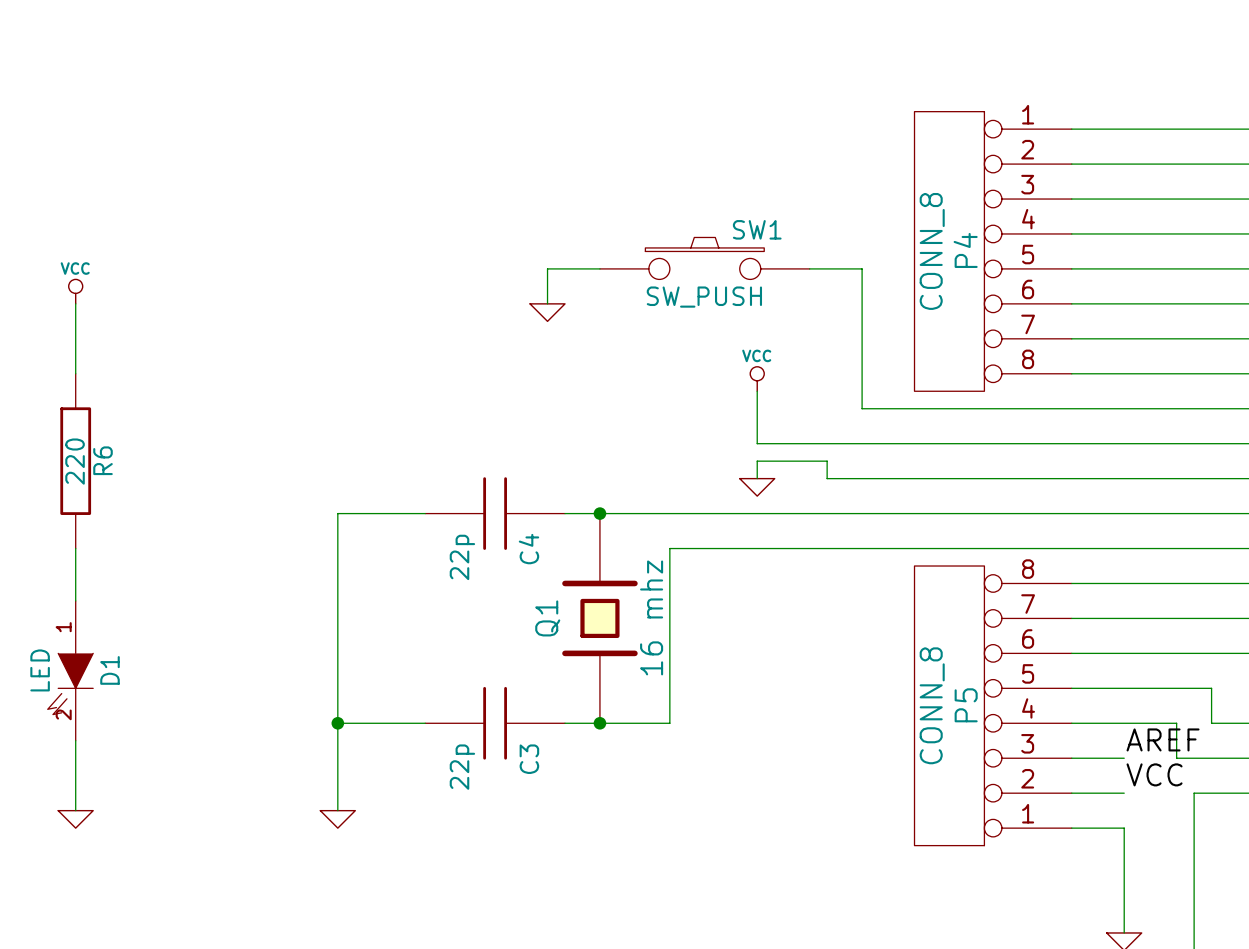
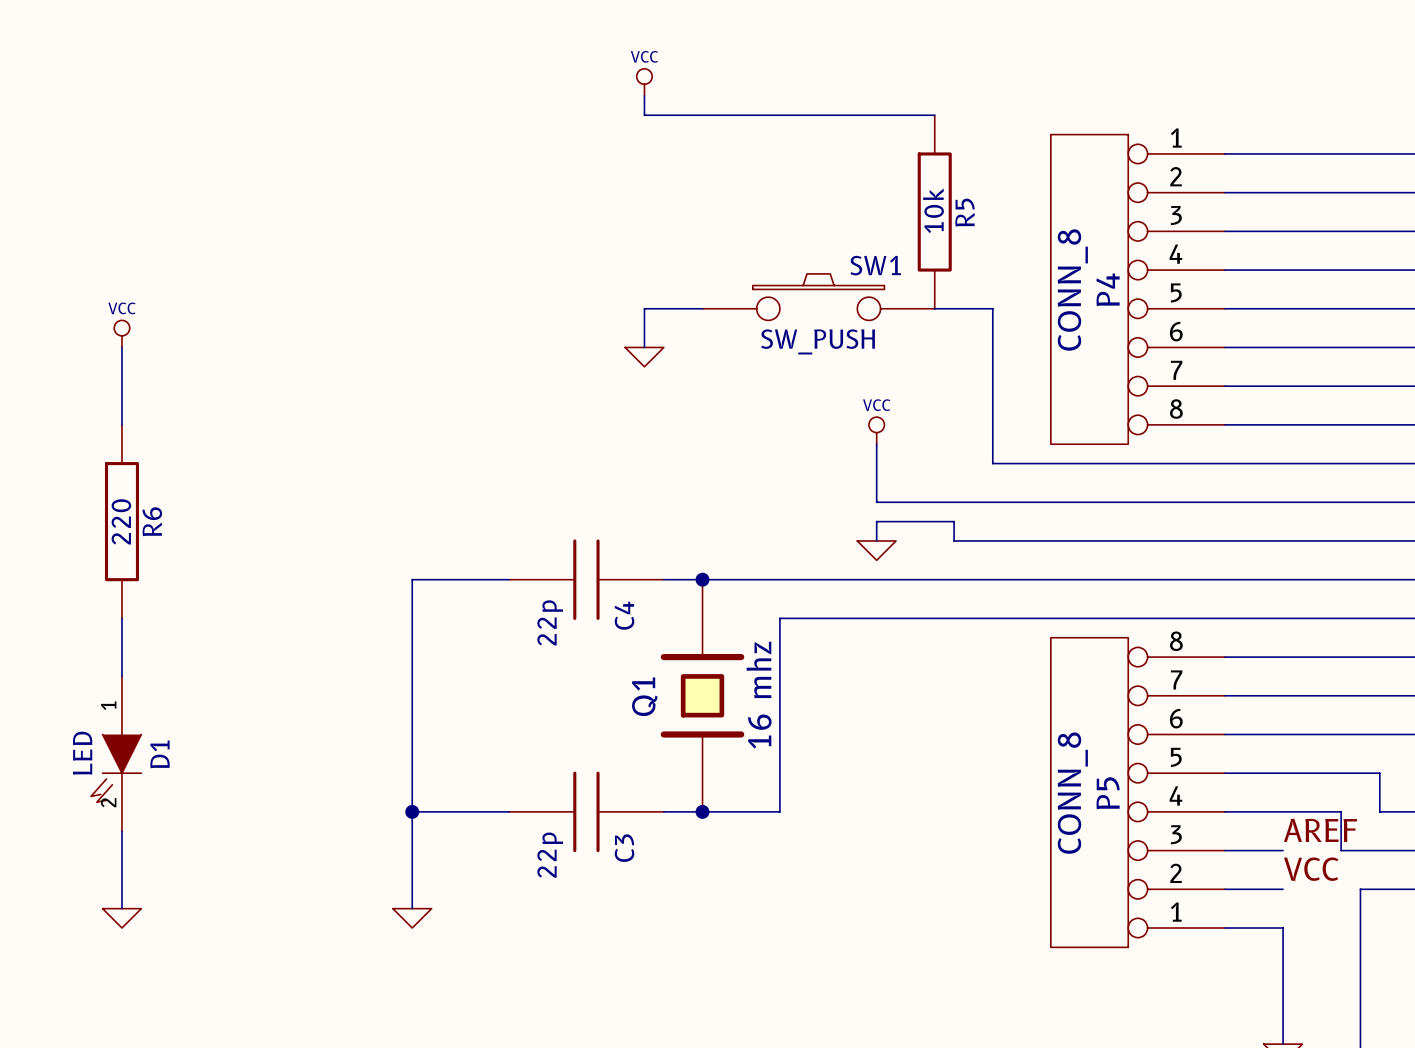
power symbol: none -> VCC (644, 82)
wire: none -> (644, 95) (644, 115) (934, 115)
R5: none -> 10k (934, 212)

